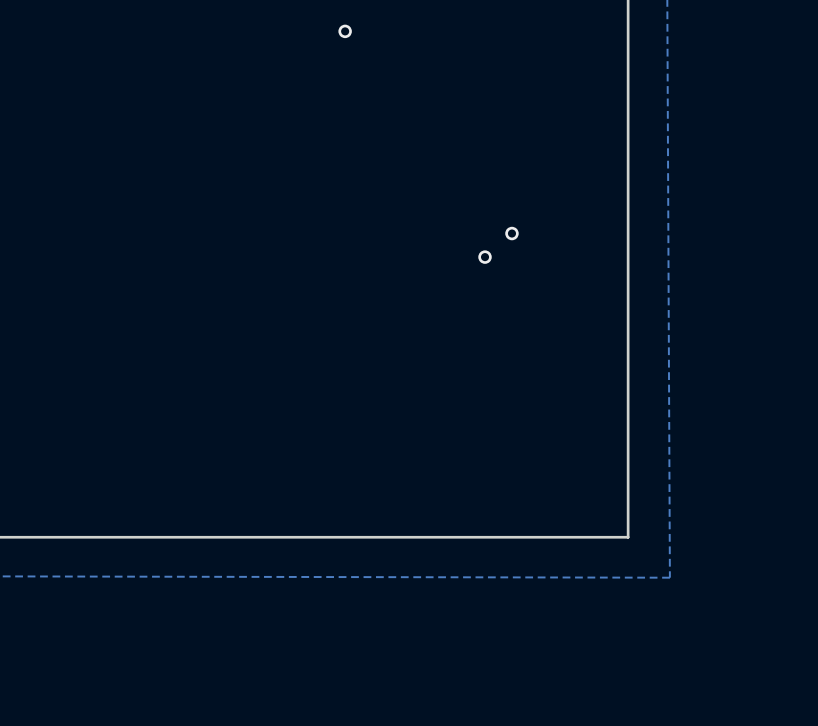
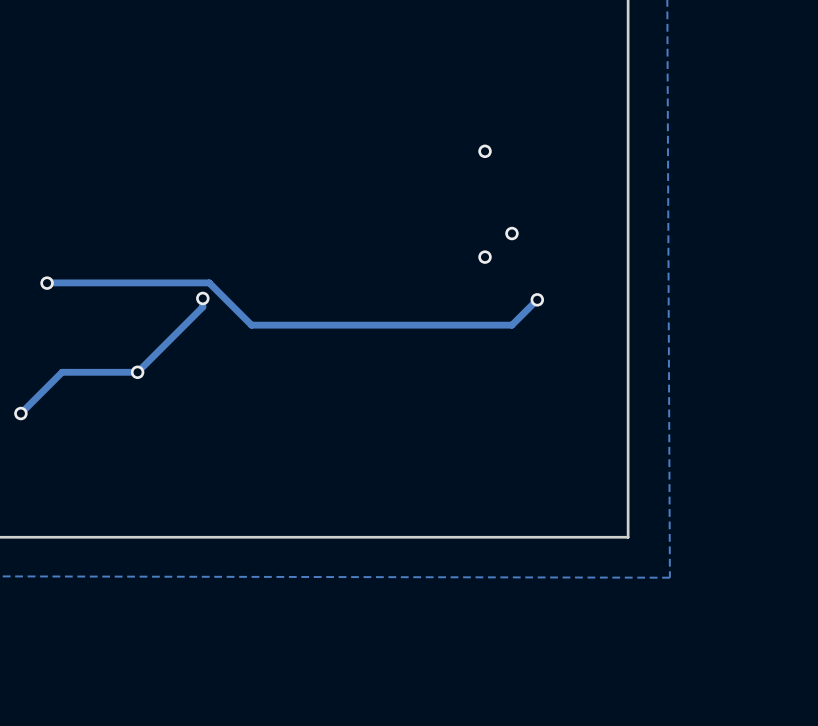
via: (345, 31) -> none
via: none -> (485, 151)
track: none -> (47, 282) (209, 282) (251, 325) (511, 325) (537, 299)
via: none -> (47, 283)
track: none -> (202, 298) (202, 307) (137, 372) (62, 372) (20, 413)
via: none -> (202, 298)
via: none -> (537, 299)
via: none -> (137, 372)
via: none -> (20, 413)

